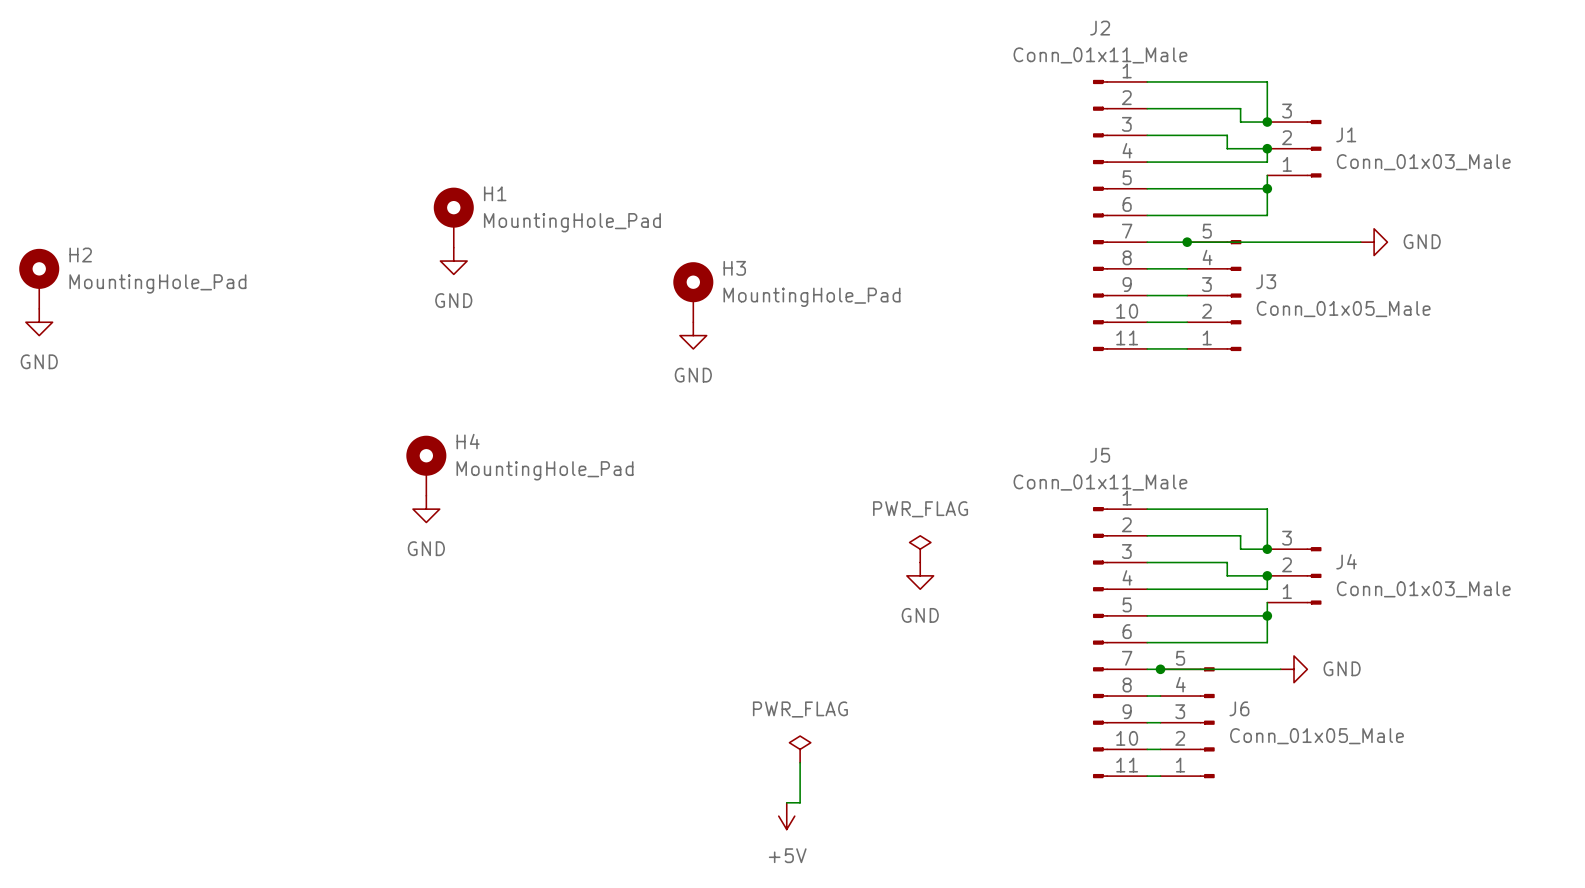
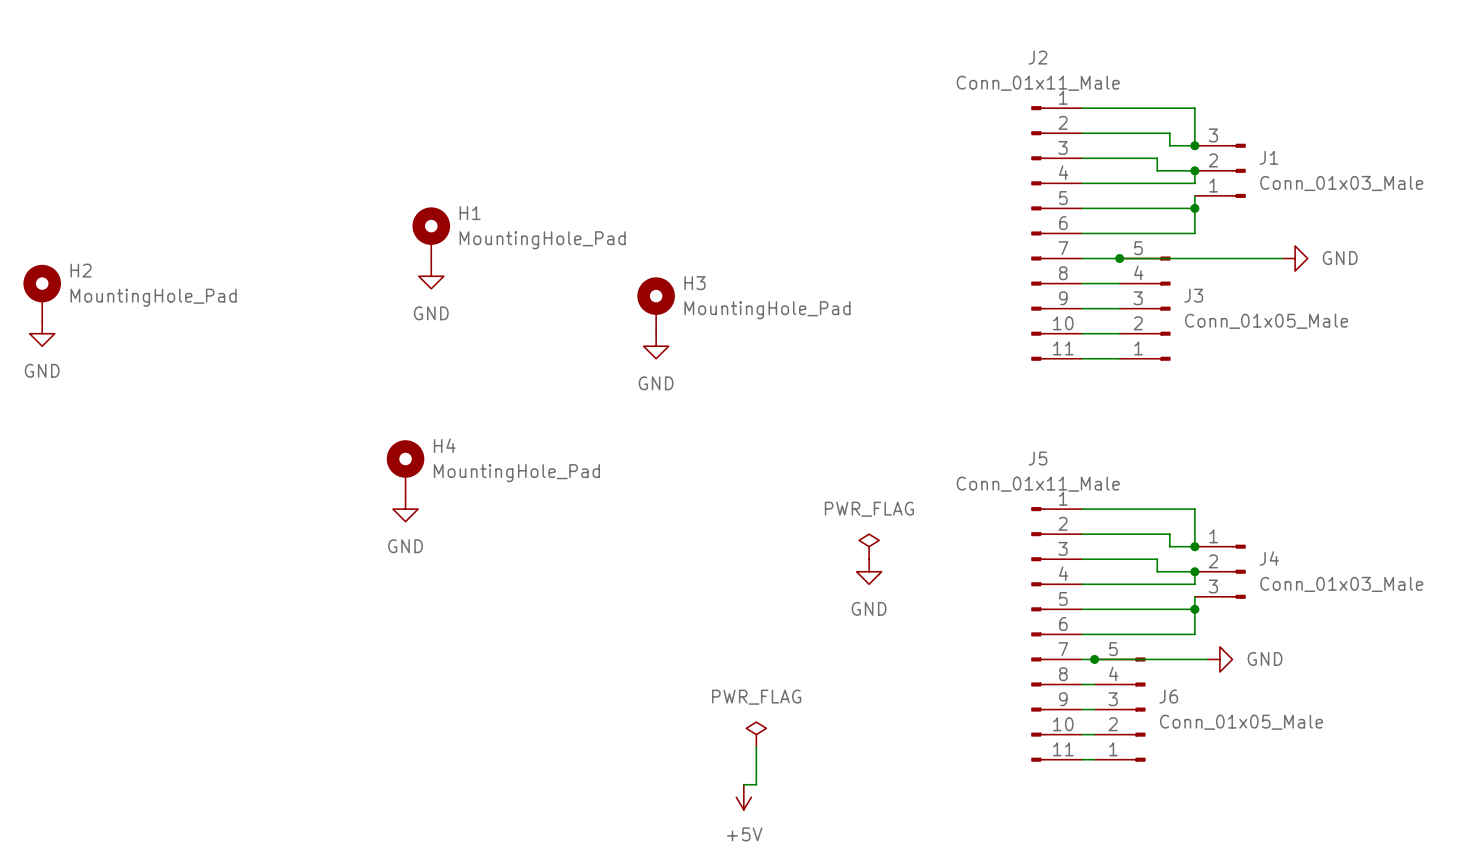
J4 flip: as is (1314, 575) -> up-down (1238, 571)

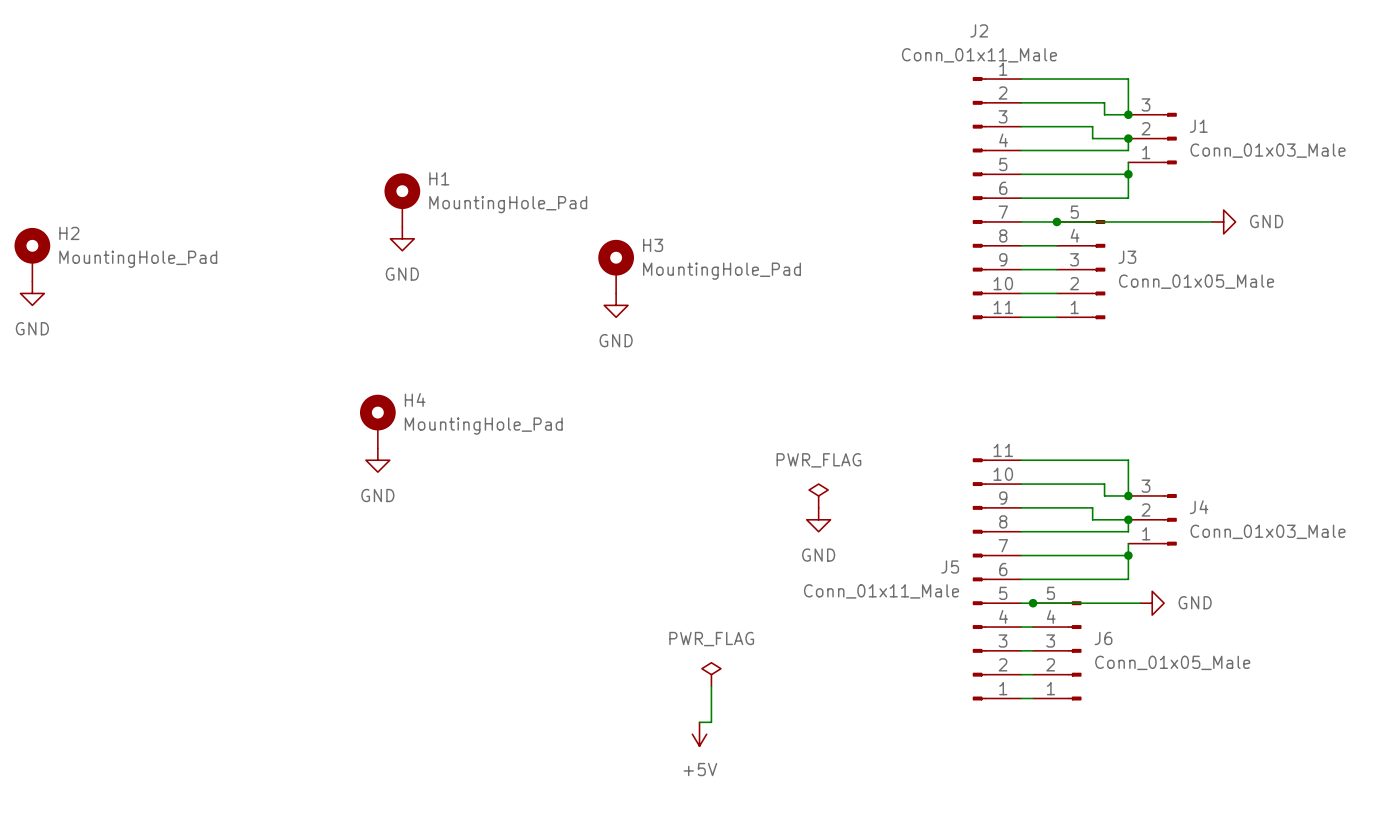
J5 name position: J5 (1037, 458) -> J5 (950, 567)
J5 value position: Conn_01x11_Male (1038, 484) -> Conn_01x11_Male (881, 591)
J4 flip: as is (1238, 571) -> up-down (1170, 519)
J5 flip: as is (1038, 634) -> up-down (979, 579)

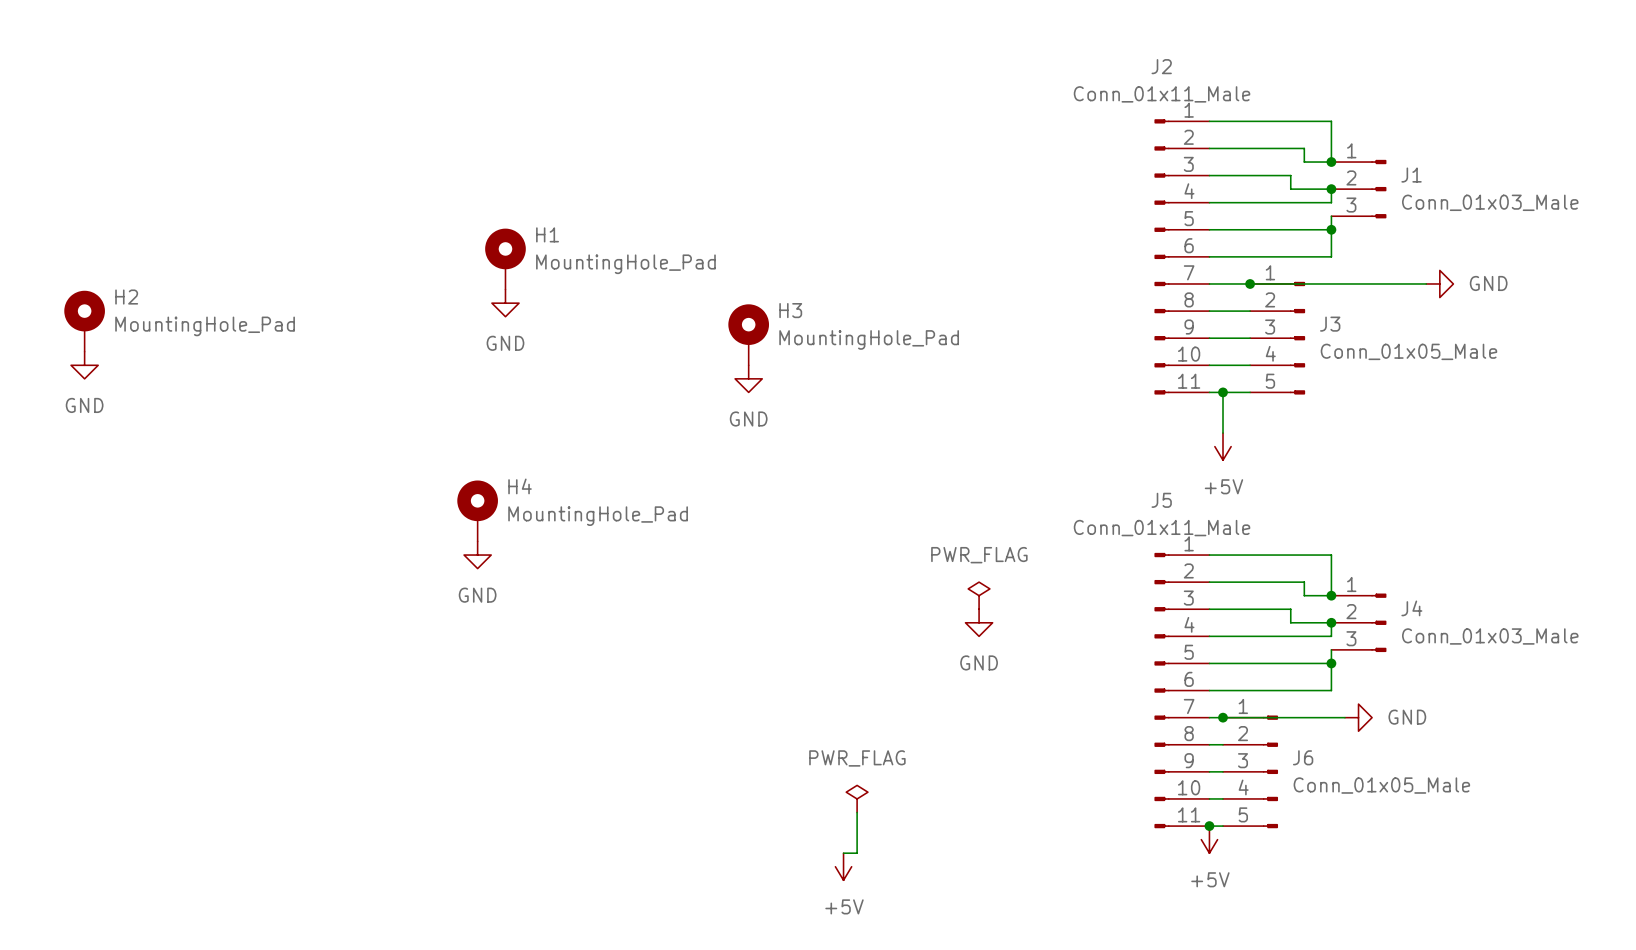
J1 flip: as is (1170, 138) -> up-down (1378, 189)
J3 flip: as is (1098, 269) -> up-down (1297, 338)
wire: none -> (1223, 392) (1223, 433)
junction: none -> (1223, 392)
power symbol: none -> +5V (1223, 446)
J4 flip: as is (1170, 519) -> up-down (1378, 622)
J5 name position: J5 (950, 567) -> J5 (1161, 500)
J5 flip: as is (979, 579) -> up-down (1162, 690)
J5 value position: Conn_01x11_Male (881, 591) -> Conn_01x11_Male (1162, 528)
J6 flip: as is (1074, 650) -> up-down (1270, 771)
junction: none -> (1209, 826)
power symbol: none -> +5V (1209, 839)

